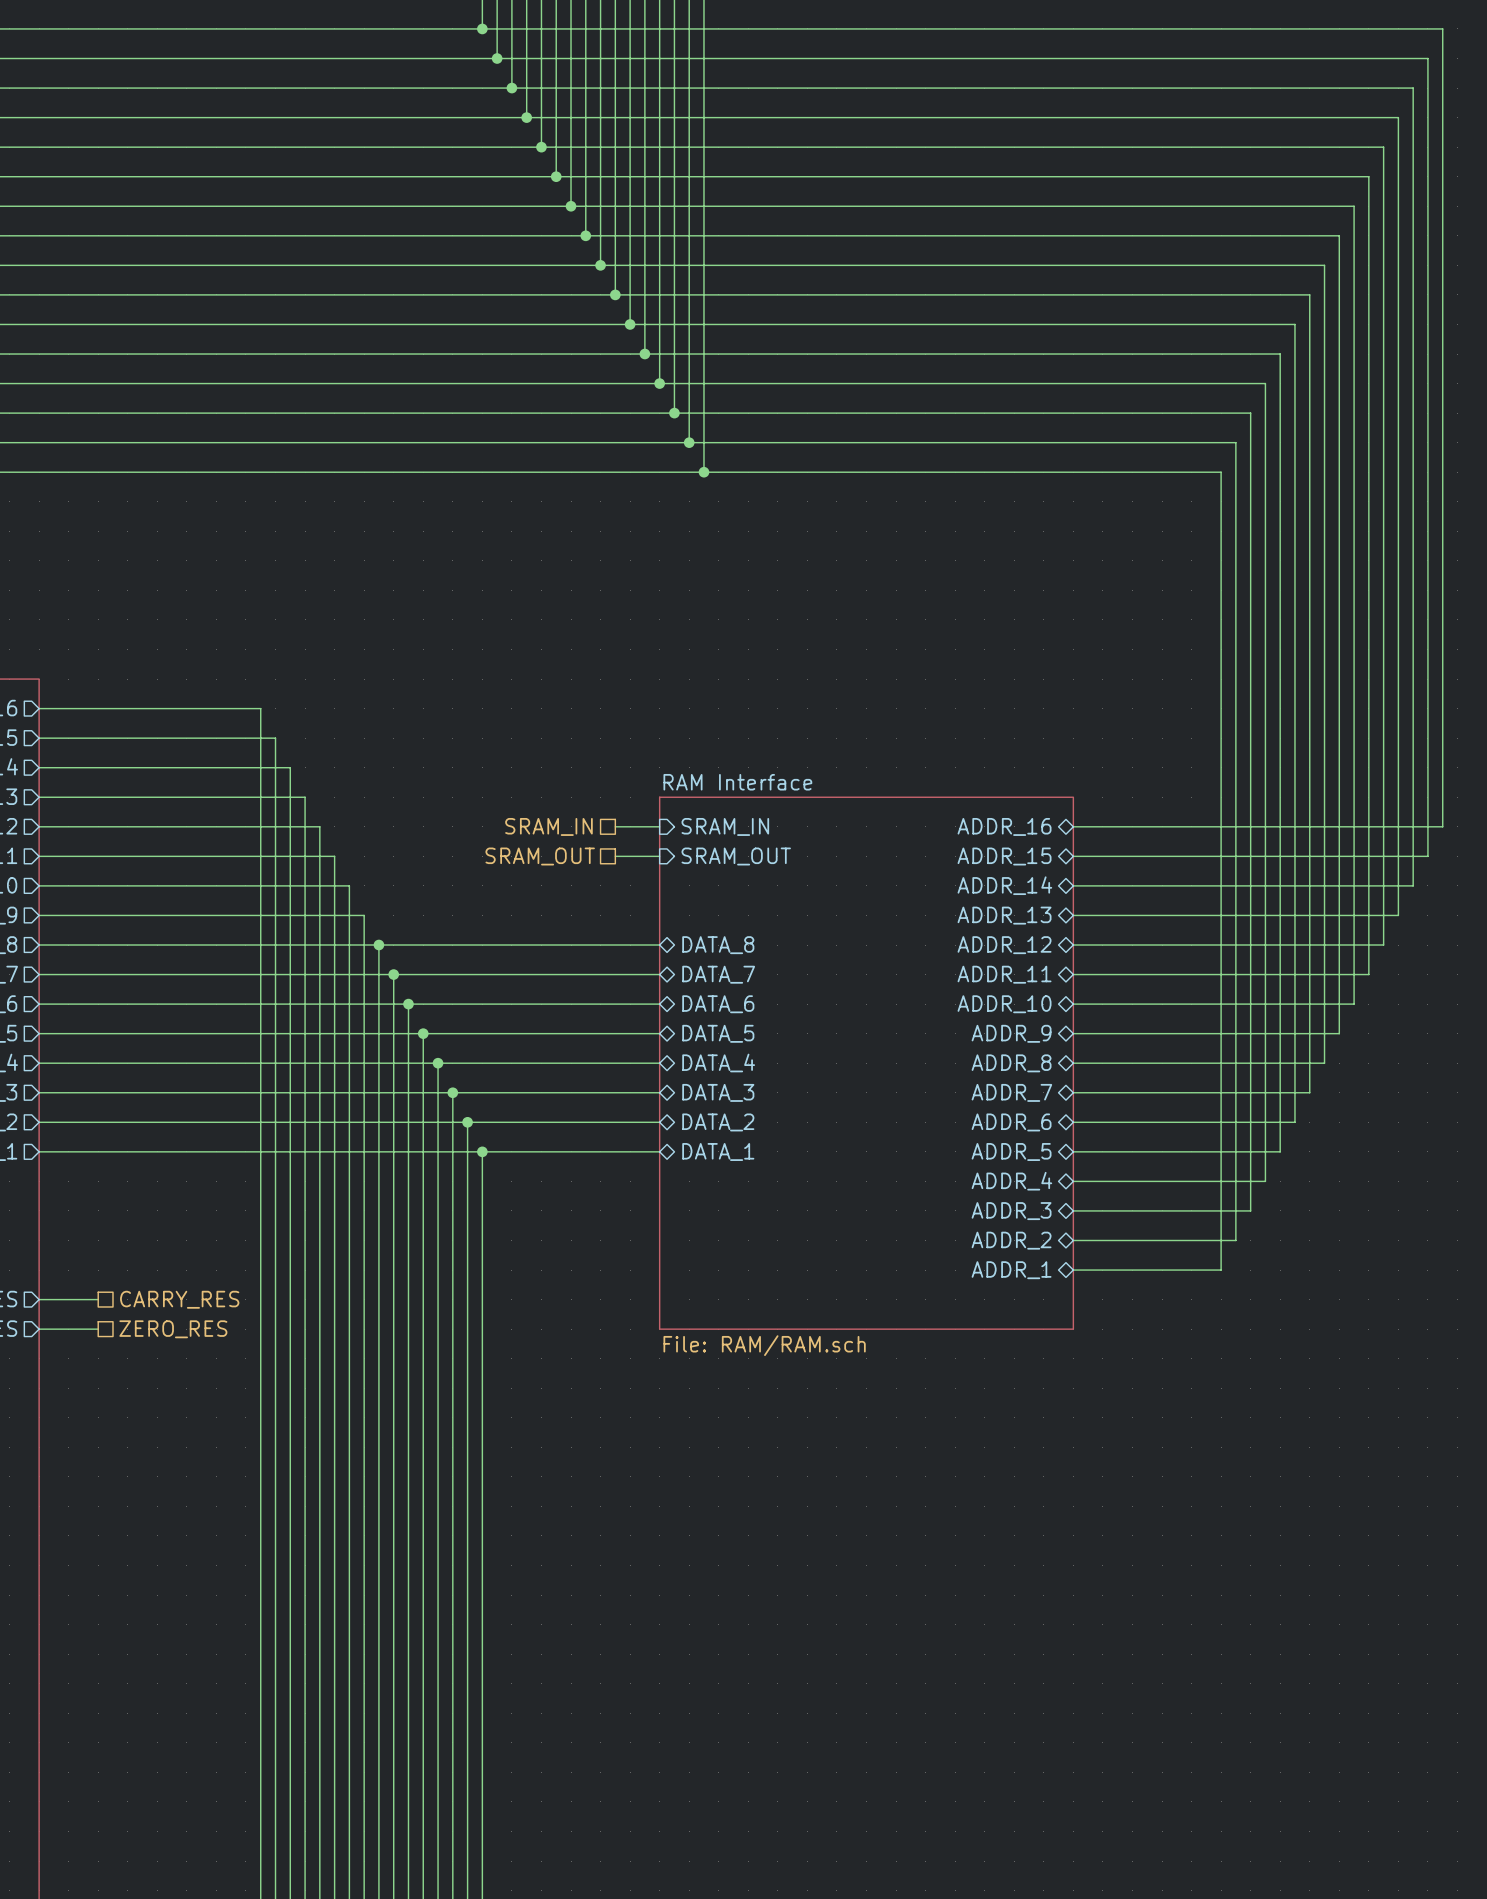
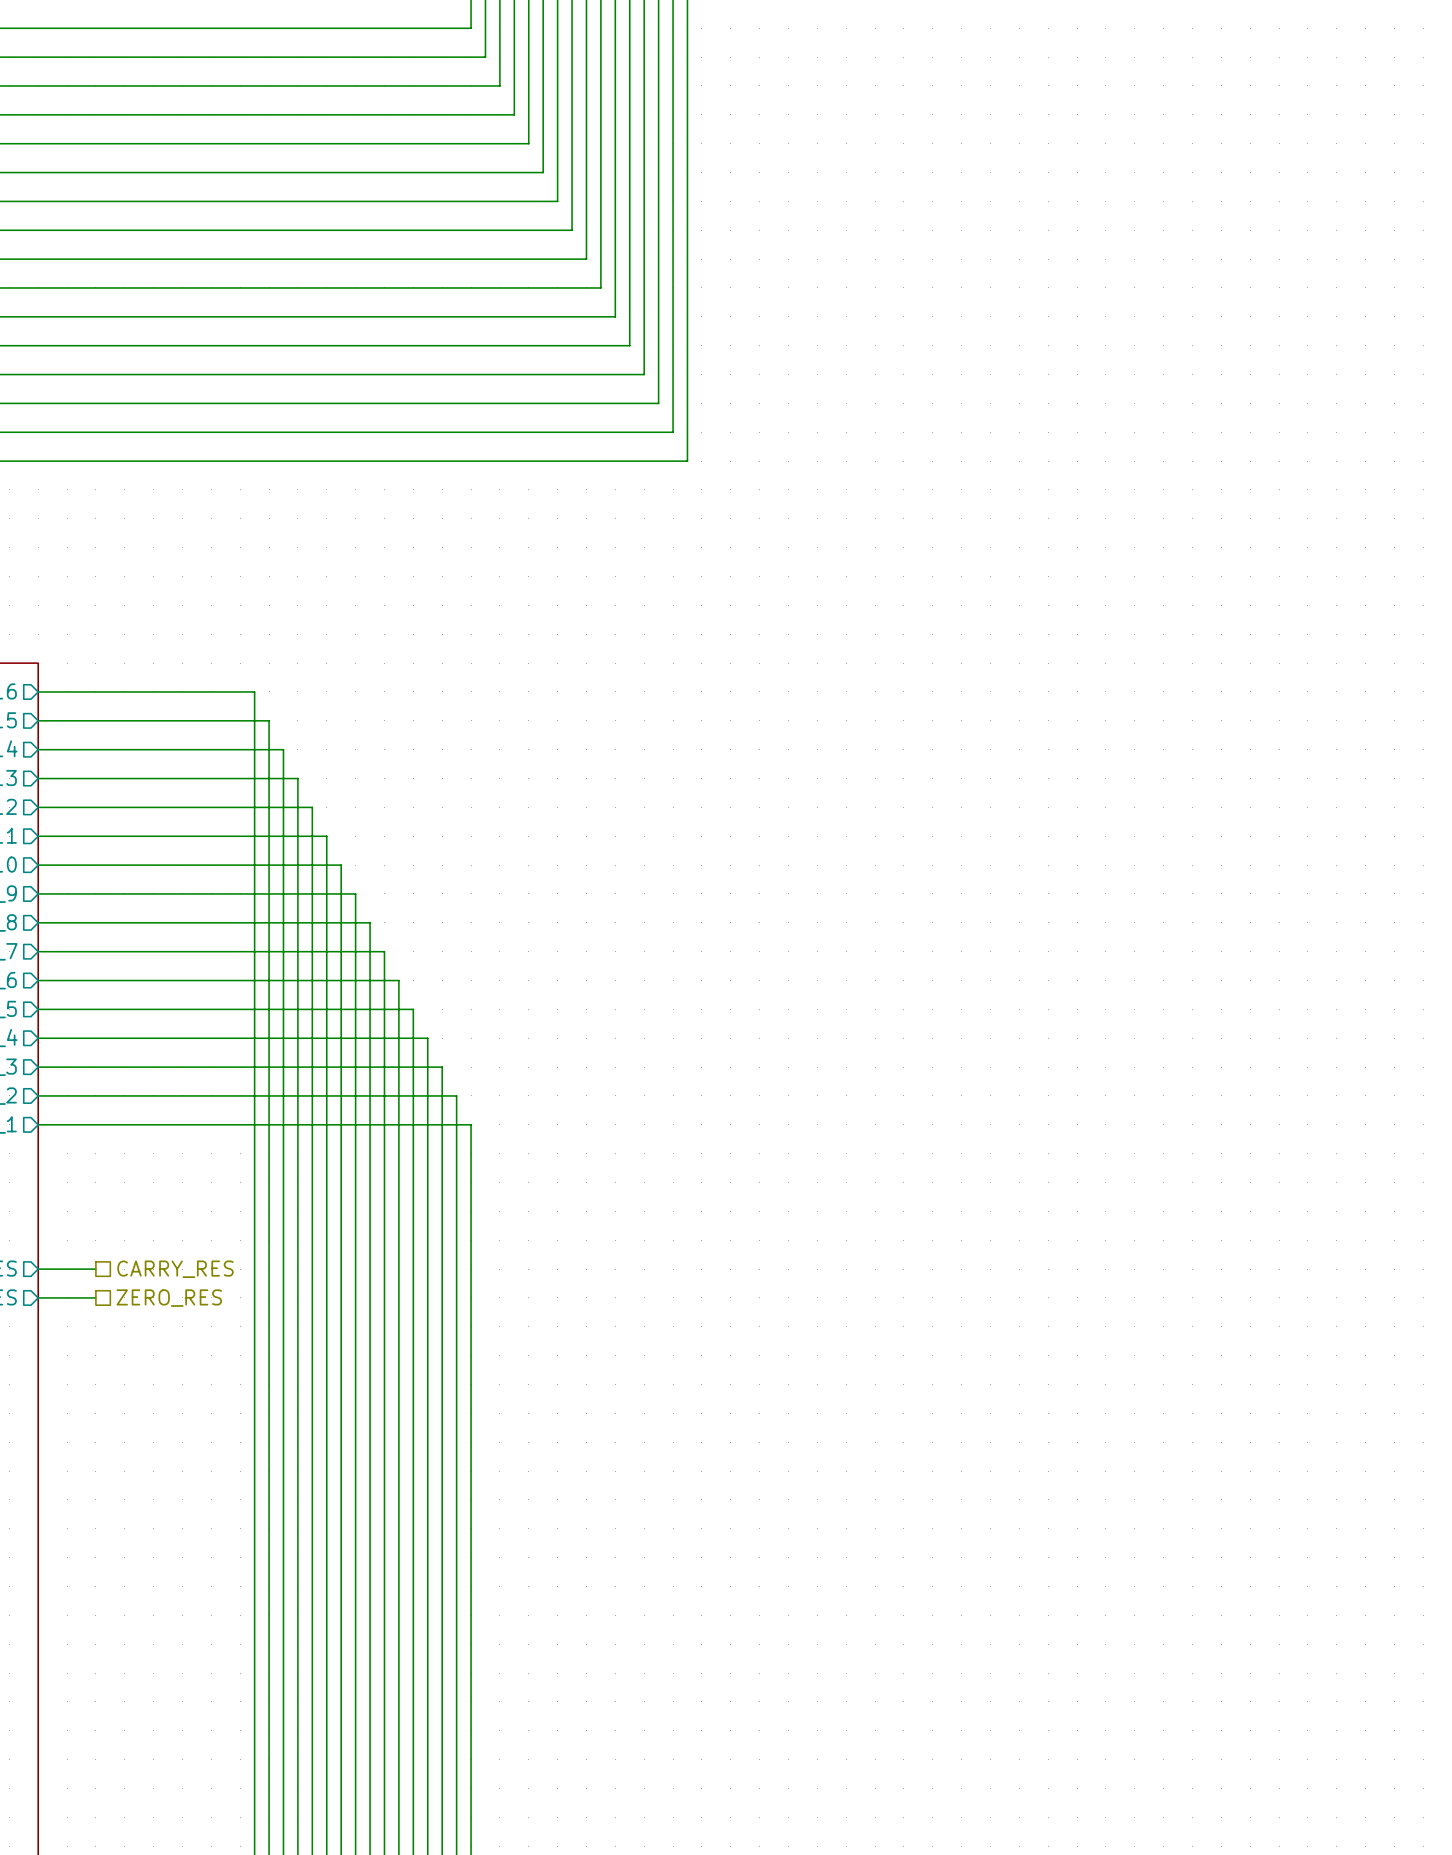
wire: (482, 28) (1442, 28) (1442, 826) (1073, 826) -> none
junction: (482, 28) -> none
wire: (497, 58) (1427, 58) (1427, 856) (1073, 856) -> none
junction: (497, 58) -> none
wire: (511, 88) (1413, 88) (1413, 885) (1073, 885) -> none
junction: (511, 88) -> none
wire: (526, 117) (1398, 117) (1398, 915) (1073, 915) -> none
junction: (526, 117) -> none
wire: (541, 147) (1383, 147) (1383, 945) (1073, 945) -> none
junction: (541, 147) -> none
wire: (556, 176) (1368, 176) (1368, 974) (1073, 974) -> none
junction: (556, 176) -> none
wire: (571, 206) (1354, 206) (1354, 1004) (1073, 1004) -> none
junction: (571, 206) -> none
wire: (585, 235) (1339, 235) (1339, 1033) (1073, 1033) -> none
junction: (585, 235) -> none
wire: (600, 265) (1324, 265) (1324, 1063) (1073, 1063) -> none
junction: (600, 265) -> none
wire: (615, 294) (1309, 294) (1309, 1092) (1073, 1092) -> none
junction: (615, 294) -> none
wire: (630, 324) (1294, 324) (1294, 1122) (1073, 1122) -> none
junction: (630, 324) -> none
wire: (644, 354) (1280, 354) (1280, 1151) (1073, 1151) -> none
junction: (644, 354) -> none
wire: (659, 383) (1265, 383) (1265, 1181) (1073, 1181) -> none
junction: (659, 383) -> none
wire: (674, 413) (1250, 413) (1250, 1210) (1073, 1210) -> none
junction: (674, 413) -> none
wire: (689, 442) (1235, 442) (1235, 1240) (1073, 1240) -> none
junction: (689, 442) -> none
wire: (703, 472) (1221, 472) (1221, 1270) (1073, 1270) -> none
junction: (703, 472) -> none
hierarchical label: SRAM_IN (548, 826) -> none
wire: (615, 826) (659, 826) -> none
sheet pin: SRAM_IN (725, 826) -> none
sheet pin: ADDR_16 (1004, 826) -> none
hierarchical label: SRAM_OUT (540, 856) -> none
wire: (615, 856) (659, 856) -> none
sheet pin: SRAM_OUT (736, 856) -> none
sheet pin: ADDR_15 (1004, 856) -> none
sheet pin: ADDR_14 (1004, 885) -> none
sheet pin: ADDR_13 (1004, 915) -> none
wire: (378, 945) (659, 945) -> none
junction: (378, 945) -> none
sheet pin: DATA_8 (718, 945) -> none
sheet pin: ADDR_12 (1004, 945) -> none
wire: (393, 974) (659, 974) -> none
junction: (393, 974) -> none
sheet pin: DATA_7 (718, 974) -> none
sheet pin: ADDR_11 (1004, 974) -> none
wire: (408, 1004) (659, 1004) -> none
junction: (408, 1004) -> none
sheet pin: DATA_6 (718, 1004) -> none
sheet pin: ADDR_10 (1004, 1004) -> none
wire: (423, 1033) (659, 1033) -> none
junction: (423, 1033) -> none
sheet pin: DATA_5 (718, 1033) -> none
sheet pin: ADDR_9 (1011, 1033) -> none
wire: (438, 1063) (659, 1063) -> none
junction: (438, 1063) -> none
sheet pin: DATA_4 (718, 1063) -> none
sheet RAM Interface: File: RAM/RAM.sch (866, 1063) -> none
sheet pin: ADDR_8 (1011, 1063) -> none
wire: (452, 1092) (659, 1092) -> none
junction: (452, 1092) -> none
sheet pin: DATA_3 (718, 1092) -> none
sheet pin: ADDR_7 (1011, 1092) -> none
wire: (467, 1122) (659, 1122) -> none
junction: (467, 1122) -> none
sheet pin: DATA_2 (718, 1122) -> none
sheet pin: ADDR_6 (1011, 1122) -> none
wire: (482, 1151) (659, 1151) -> none
junction: (482, 1151) -> none
sheet pin: DATA_1 (718, 1152) -> none
sheet pin: ADDR_5 (1011, 1152) -> none
sheet pin: ADDR_4 (1011, 1181) -> none
sheet pin: ADDR_3 (1011, 1211) -> none
sheet pin: ADDR_2 (1011, 1240) -> none
sheet pin: ADDR_1 (1011, 1270) -> none

